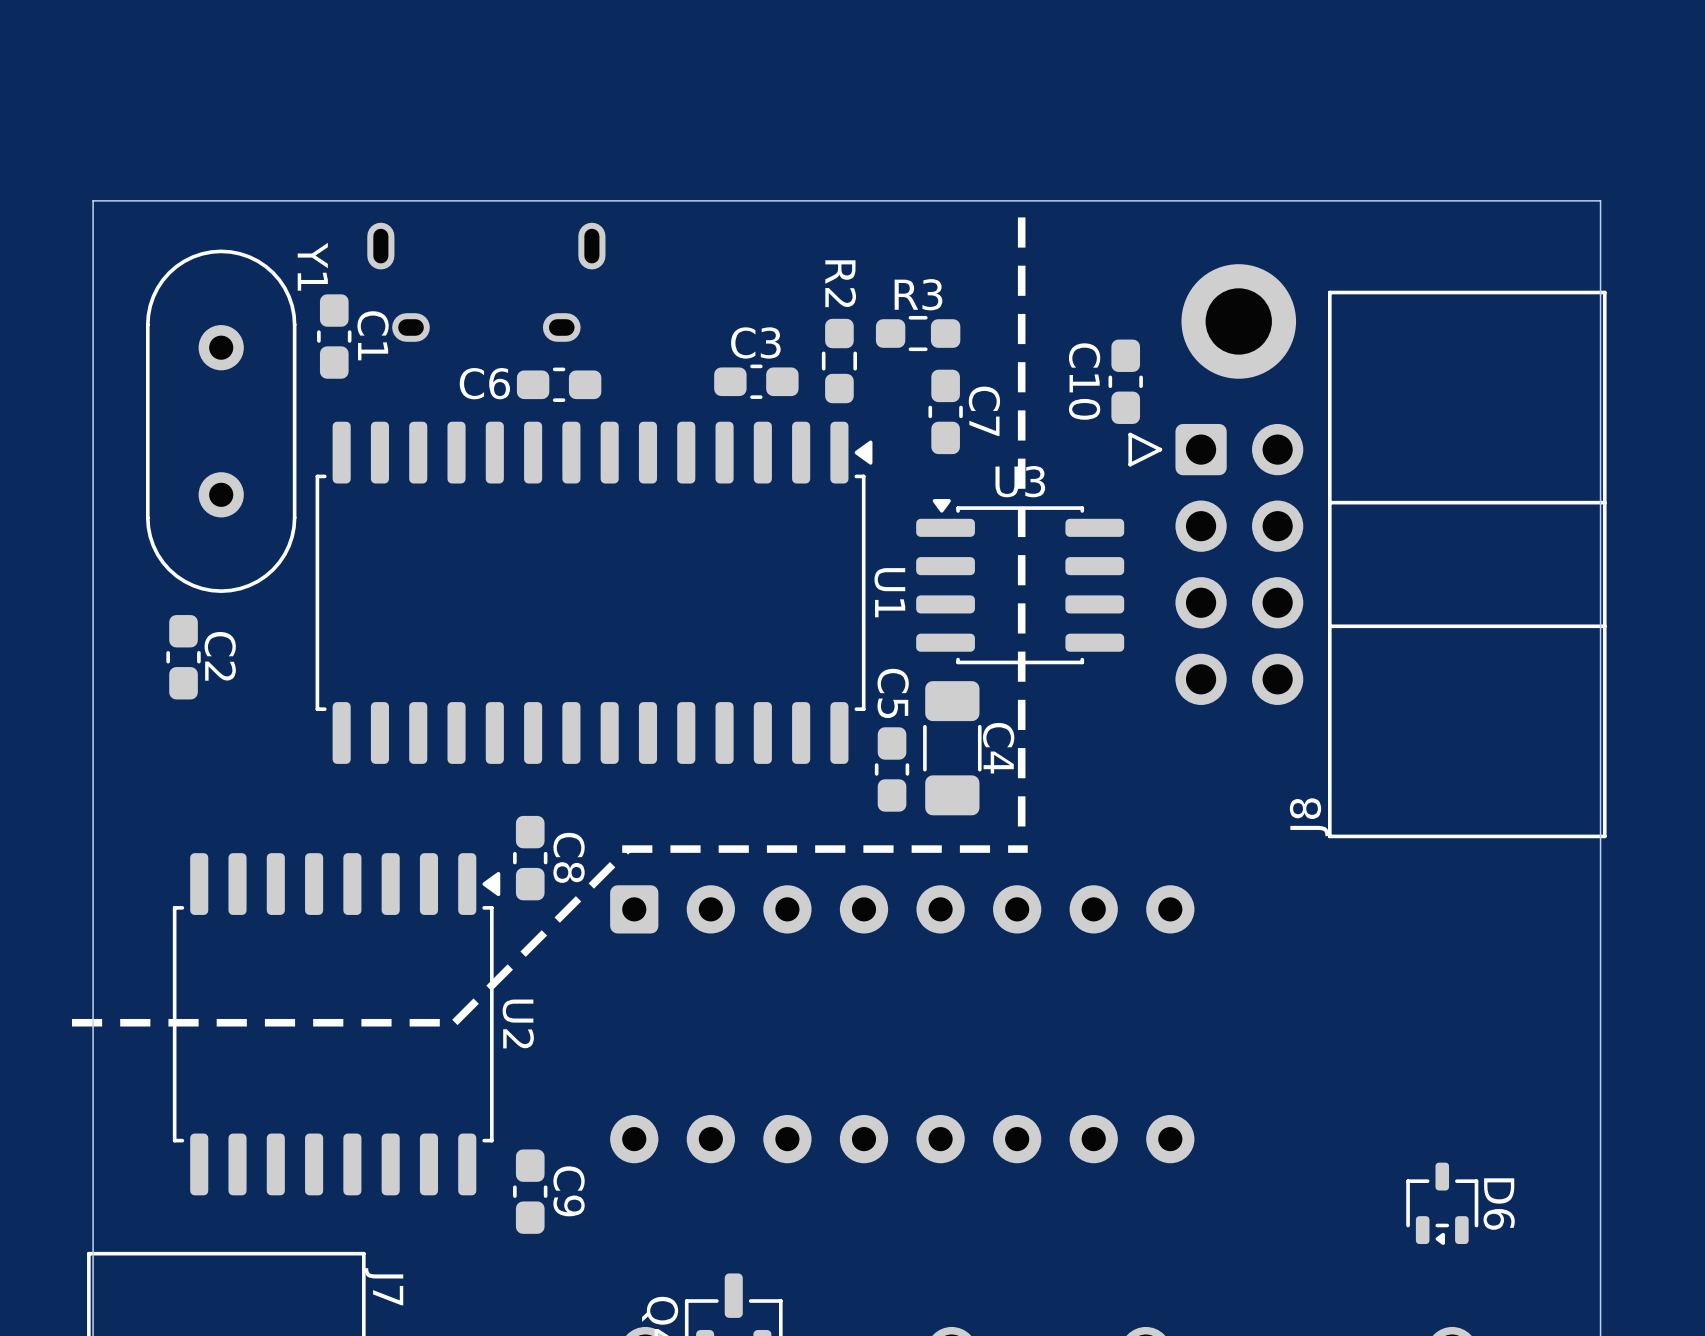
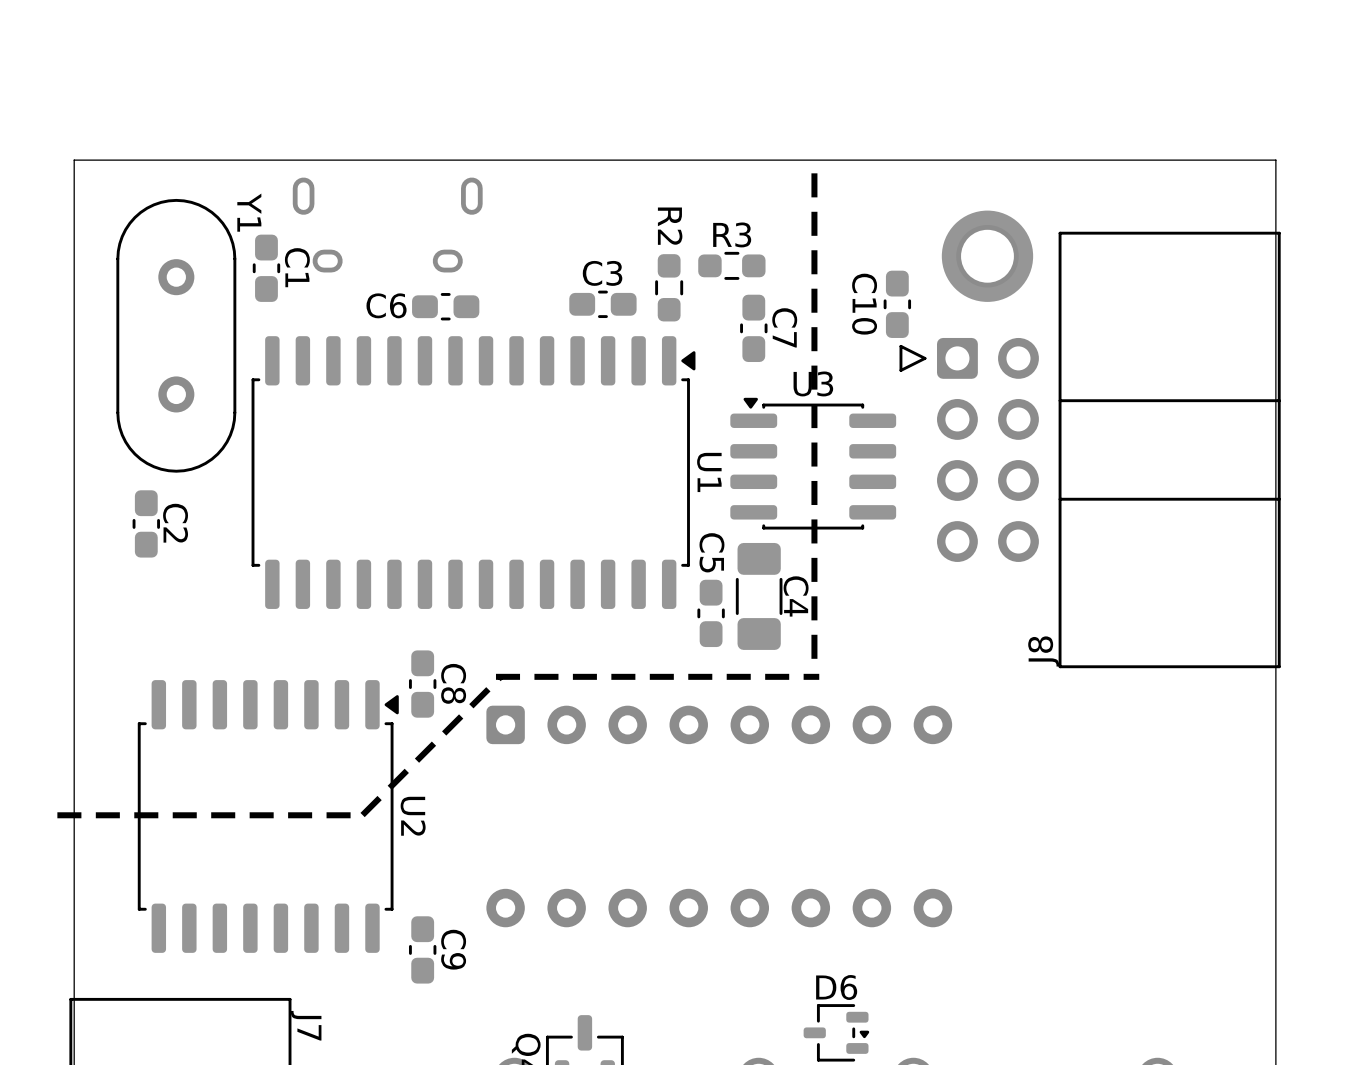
D6 rotation: 0° (1442, 1203) -> 90° counterclockwise (836, 1032)
D6 position: (1442, 1203) -> (836, 1032)

